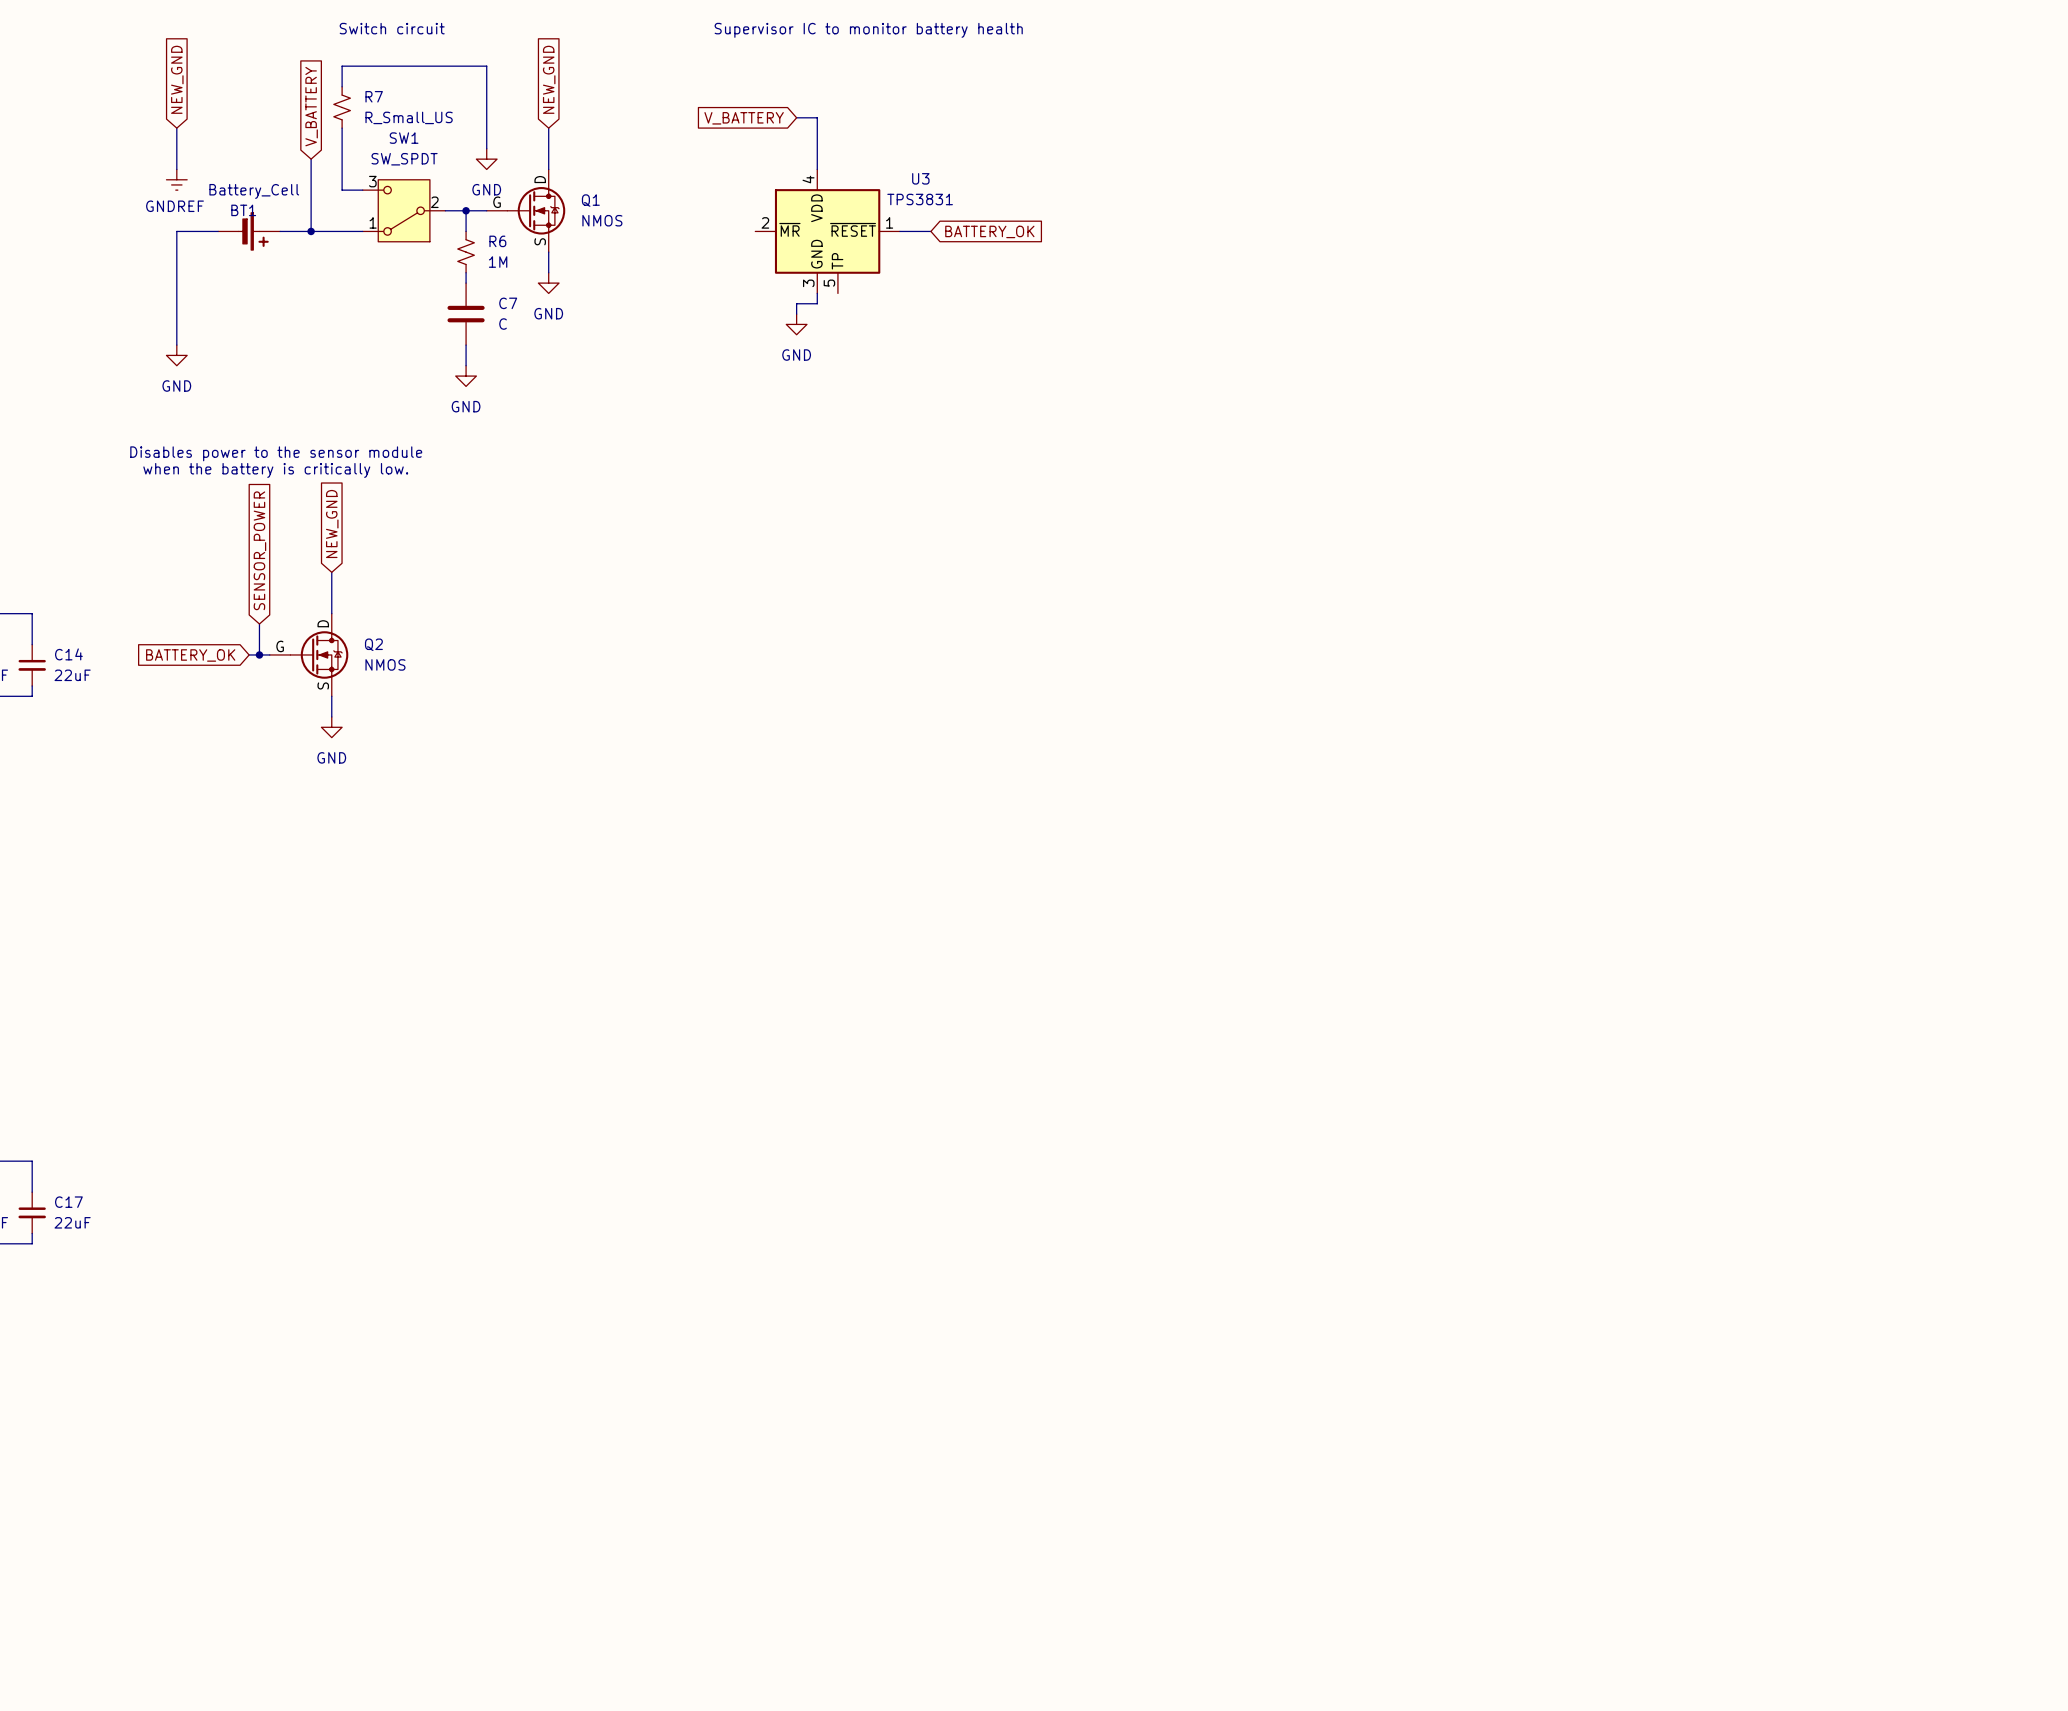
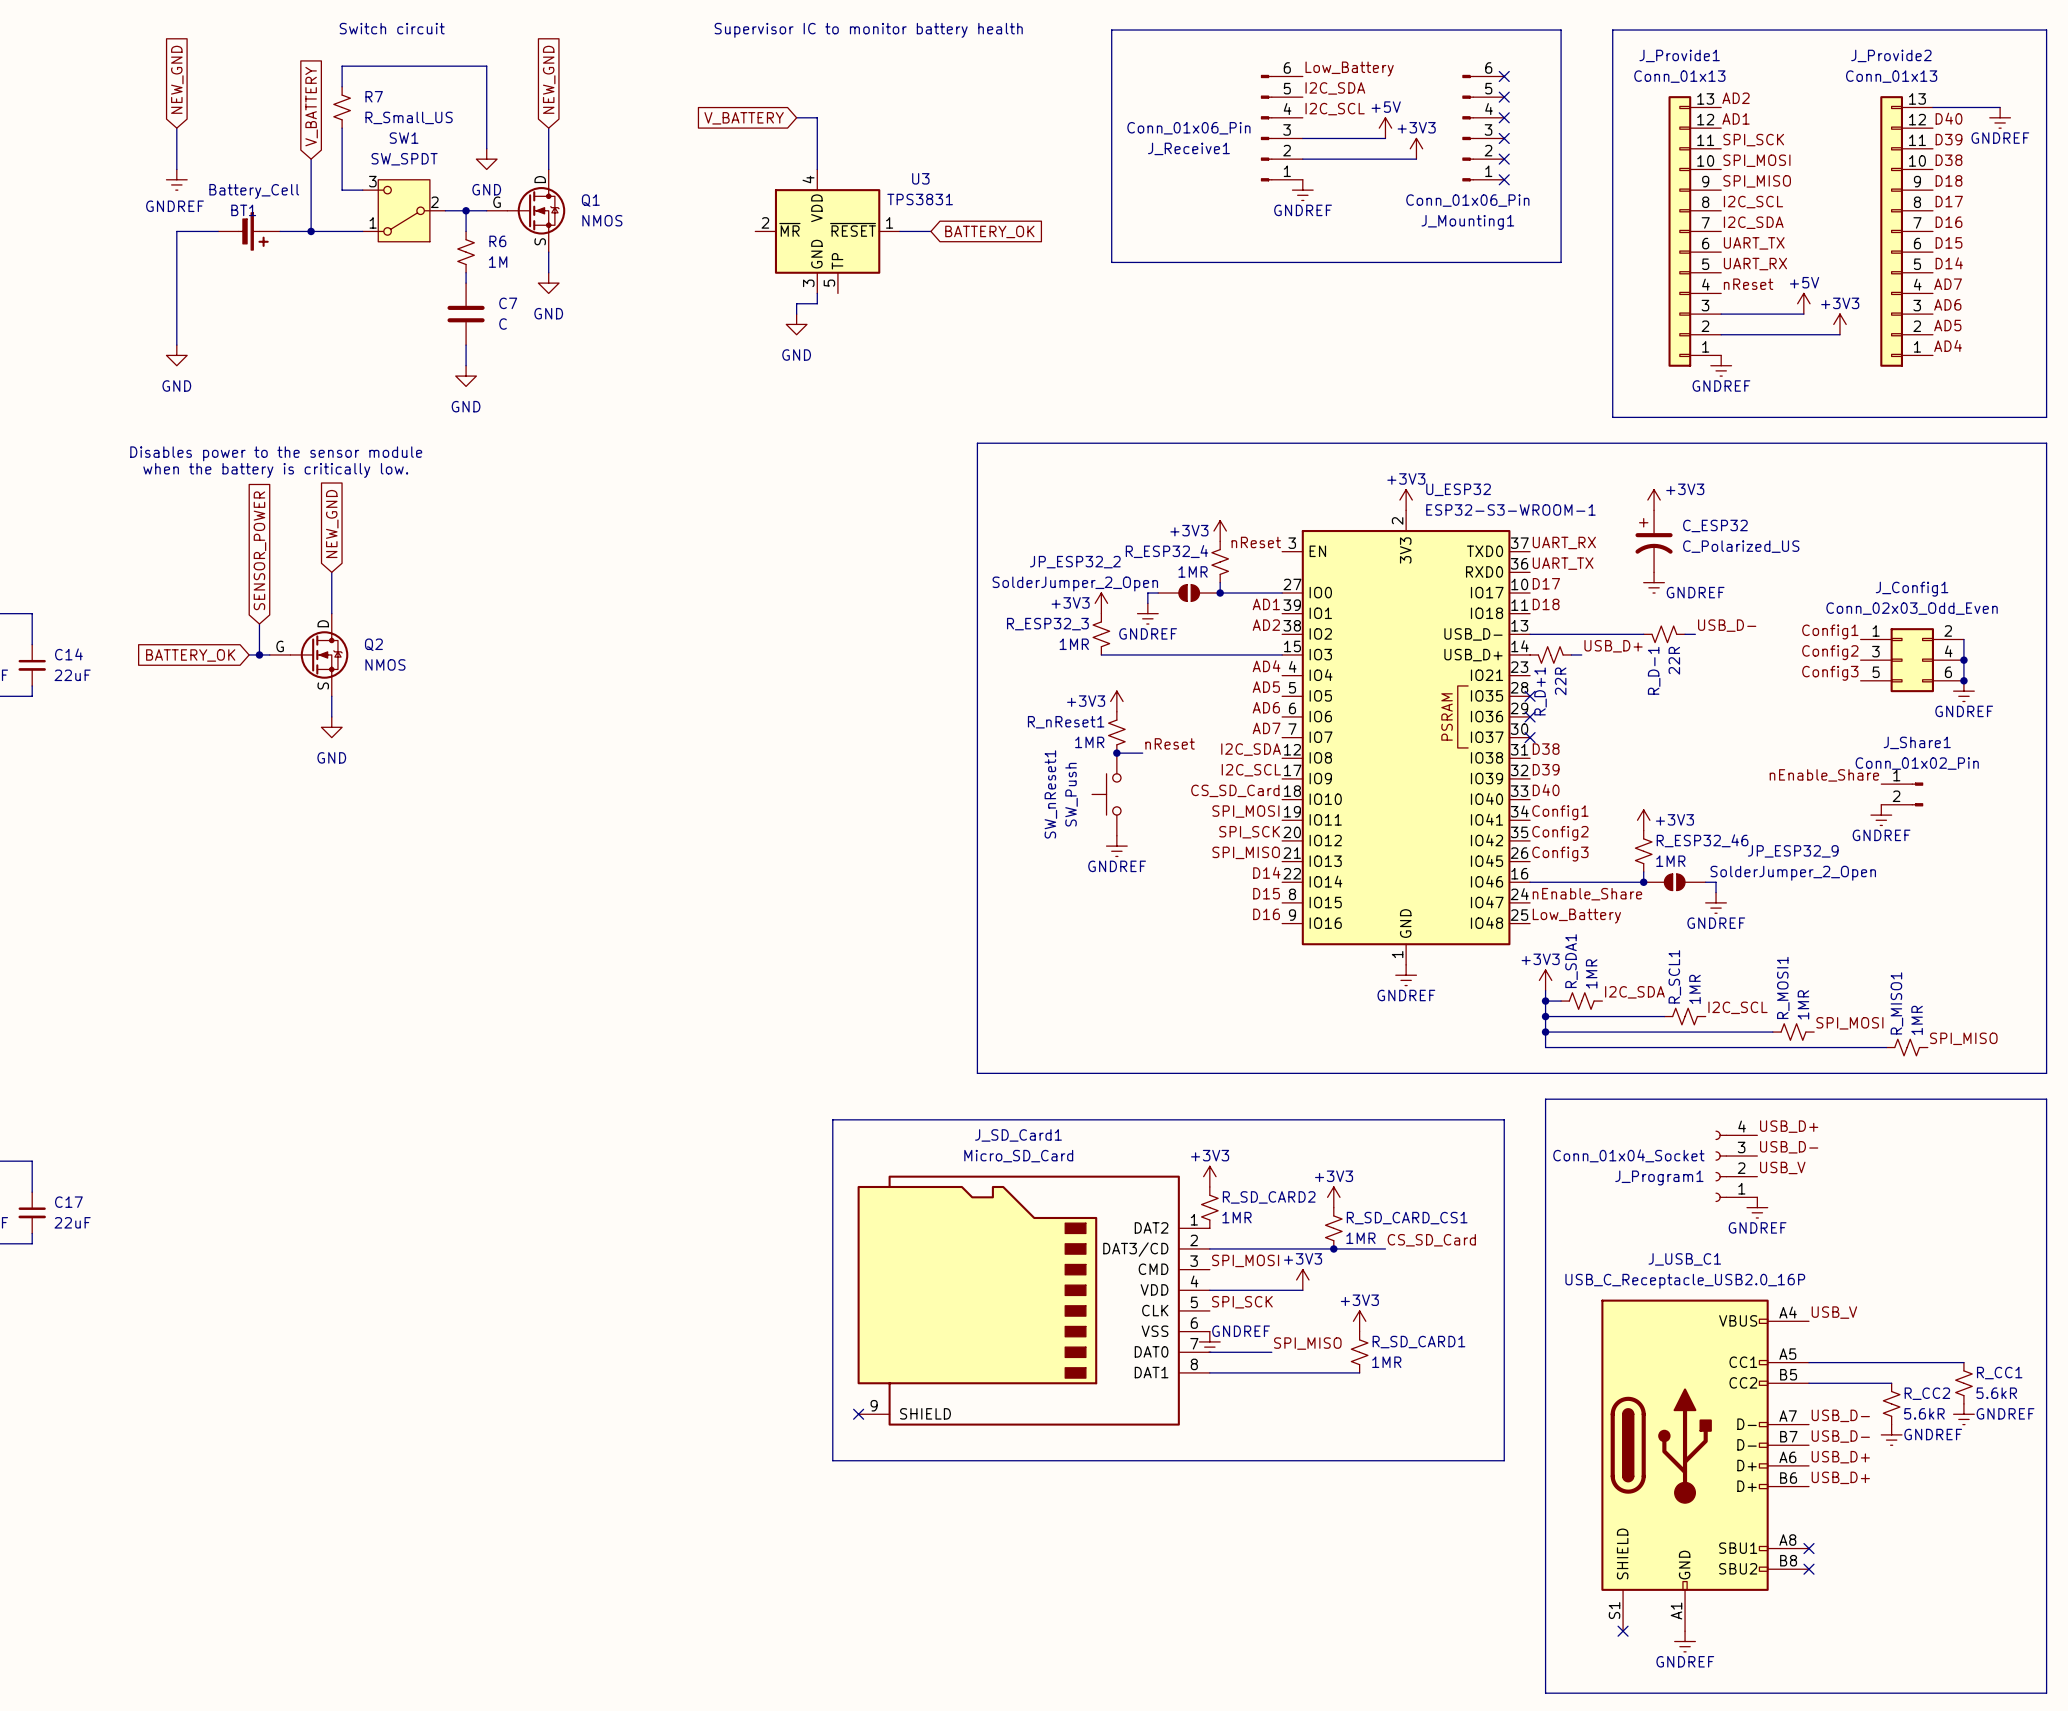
line: none -> (1111, 30) (1561, 30) (1561, 262) (1111, 262) (1111, 30)
line: none -> (1612, 30) (2046, 30) (2046, 417) (1612, 417) (1612, 30)
label: none -> Low_Battery (1349, 68)
no-connect mark: none -> (1504, 76)
label: none -> I2C_SDA (1335, 88)
no-connect mark: none -> (1504, 97)
label: none -> AD2 (1736, 98)
wire: none -> (1932, 107) (2000, 107)
label: none -> I2C_SCL (1335, 109)
no-connect mark: none -> (1504, 117)
power symbol: none -> GNDREF (2000, 117)
label: none -> AD1 (1736, 118)
label: none -> D40 (1949, 118)
J_Receive1: none -> Conn_01x06_Pin (1281, 128)
power symbol: none -> +5V (1385, 128)
J_Mounting1: none -> Conn_01x06_Pin (1483, 128)
wire: none -> (1302, 138) (1385, 138)
no-connect mark: none -> (1504, 138)
label: none -> D39 (1949, 139)
label: none -> SPI_SCK (1753, 140)
power symbol: none -> +3V3 (1416, 148)
wire: none -> (1302, 159) (1416, 159)
no-connect mark: none -> (1504, 159)
label: none -> SPI_MOSI (1756, 160)
label: none -> D38 (1949, 160)
no-connect mark: none -> (1504, 179)
label: none -> D18 (1949, 180)
label: none -> SPI_MISO (1757, 181)
power symbol: none -> GNDREF (1302, 190)
label: none -> D17 (1949, 201)
label: none -> I2C_SCL (1753, 202)
label: none -> I2C_SDA (1753, 222)
label: none -> D16 (1949, 222)
J_Provide1: none -> Conn_01x13 (1694, 231)
J_Provide2: none -> Conn_01x13 (1906, 231)
label: none -> D15 (1949, 242)
label: none -> UART_TX (1754, 243)
label: none -> D14 (1949, 263)
label: none -> UART_RX (1755, 264)
label: none -> nReset (1748, 284)
label: none -> AD7 (1948, 284)
power symbol: none -> +5V (1803, 303)
label: none -> AD6 (1947, 304)
wire: none -> (1721, 314) (1803, 314)
power symbol: none -> +3V3 (1839, 324)
label: none -> AD5 (1947, 325)
wire: none -> (1721, 334) (1839, 334)
label: none -> AD4 (1948, 345)
power symbol: none -> GNDREF (1721, 365)
line: none -> (977, 443) (2046, 443) (2046, 1073) (977, 1073) (977, 443)
power symbol: none -> +3V3 (1406, 500)
power symbol: none -> +3V3 (1654, 500)
power symbol: none -> +3V3 (1220, 531)
C_ESP32: none -> C_Polarized_US (1654, 541)
label: none -> nReset (1256, 542)
label: none -> UART_RX (1564, 542)
R_ESP32_4: none -> 1MR (1220, 562)
label: none -> UART_TX (1563, 563)
wire: none -> (1220, 582) (1220, 593) (1282, 593)
power symbol: none -> GNDREF (1654, 582)
label: none -> D17 (1546, 583)
wire: none -> (1158, 593) (1147, 593) (1147, 603)
JP_ESP32_2: none -> SolderJumper_2_Open (1189, 593)
junction: none -> (1220, 593)
power symbol: none -> +3V3 (1101, 603)
label: none -> AD1 (1266, 604)
label: none -> D18 (1546, 604)
power symbol: none -> GNDREF (1147, 613)
label: none -> AD2 (1266, 625)
label: none -> USB_D- (1727, 625)
label: none -> Config1 (1830, 631)
R_ESP32_3: none -> 1MR (1101, 634)
wire: none -> (1530, 634) (1643, 634)
R_D-1: none -> 22R (1664, 634)
wire: none -> (1685, 634) (1695, 634)
wire: none -> (1963, 639) (1963, 680)
label: none -> USB_D+ (1613, 646)
label: none -> Config2 (1830, 652)
wire: none -> (1101, 654) (1282, 654)
R_D+1: none -> 22R (1550, 654)
wire: none -> (1571, 654) (1581, 654)
J_Config1: none -> Conn_02x03_Odd_Even (1912, 660)
junction: none -> (1963, 660)
label: none -> AD4 (1266, 666)
label: none -> Config3 (1830, 673)
junction: none -> (1963, 680)
label: none -> AD5 (1266, 687)
power symbol: none -> GNDREF (1963, 691)
no-connect mark: none -> (1530, 696)
power symbol: none -> +3V3 (1116, 701)
label: none -> AD6 (1266, 707)
no-connect mark: none -> (1530, 716)
label: none -> AD7 (1266, 728)
R_nReset1: none -> 1MR (1116, 732)
U_ESP32: none -> ESP32-S3-WROOM-1 (1406, 737)
no-connect mark: none -> (1530, 737)
label: none -> nReset (1170, 743)
label: none -> I2C_SDA (1251, 749)
label: none -> D38 (1546, 749)
wire: none -> (1116, 753) (1142, 753)
junction: none -> (1116, 753)
label: none -> D39 (1546, 769)
label: none -> I2C_SCL (1251, 770)
label: none -> nEnable_Share (1824, 775)
label: none -> CS_SD_Card (1235, 790)
label: none -> D40 (1546, 790)
SW_nReset1: none -> SW_Push (1106, 794)
J_Share1: none -> Conn_01x02_Pin (1902, 794)
label: none -> SPI_MOSI (1245, 811)
label: none -> Config1 (1560, 812)
power symbol: none -> GNDREF (1881, 815)
power symbol: none -> +3V3 (1643, 820)
label: none -> SPI_SCK (1249, 832)
label: none -> Config2 (1560, 833)
power symbol: none -> GNDREF (1116, 846)
R_ESP32_46: none -> 1MR (1643, 851)
label: none -> SPI_MISO (1246, 852)
label: none -> Config3 (1560, 854)
wire: none -> (1643, 871) (1643, 882) (1530, 882)
label: none -> D14 (1266, 872)
junction: none -> (1643, 882)
JP_ESP32_9: none -> SolderJumper_2_Open (1674, 882)
wire: none -> (1705, 882) (1716, 882) (1716, 892)
label: none -> D15 (1266, 893)
label: none -> nEnable_Share (1587, 894)
power symbol: none -> GNDREF (1716, 902)
label: none -> D16 (1266, 914)
label: none -> Low_Battery (1576, 916)
power symbol: none -> GNDREF (1406, 975)
power symbol: none -> +3V3 (1545, 980)
wire: none -> (1545, 990) (1545, 1047) (1886, 1047)
label: none -> I2C_SDA (1634, 992)
wire: none -> (1545, 1001) (1561, 1001)
junction: none -> (1545, 1001)
R_SDA1: none -> 1MR (1581, 1001)
label: none -> I2C_SCL (1737, 1007)
wire: none -> (1545, 1016) (1664, 1016)
junction: none -> (1545, 1016)
R_SCL1: none -> 1MR (1685, 1016)
label: none -> SPI_MOSI (1849, 1023)
wire: none -> (1545, 1032) (1772, 1032)
junction: none -> (1545, 1032)
R_MOSI1: none -> 1MR (1793, 1032)
label: none -> SPI_MISO (1963, 1038)
R_MISO1: none -> 1MR (1907, 1047)
line: none -> (1545, 1099) (2046, 1099) (2046, 1693) (1545, 1693) (1545, 1099)
line: none -> (832, 1119) (1504, 1119) (1504, 1460) (832, 1460) (832, 1119)
label: none -> USB_D+ (1789, 1126)
label: none -> USB_D- (1789, 1147)
J_Program1: none -> Conn_01x04_Socket (1736, 1166)
label: none -> USB_V (1782, 1167)
power symbol: none -> +3V3 (1209, 1176)
power symbol: none -> +3V3 (1333, 1197)
R_SD_CARD2: none -> 1MR (1209, 1207)
power symbol: none -> GNDREF (1757, 1207)
R_SD_CARD_CS1: none -> 1MR (1333, 1228)
label: none -> CS_SD_Card (1431, 1240)
wire: none -> (1209, 1248) (1385, 1248)
junction: none -> (1333, 1248)
label: none -> SPI_MOSI (1245, 1260)
power symbol: none -> +3V3 (1302, 1279)
wire: none -> (1209, 1290) (1302, 1290)
J_SD_Card1: none -> Micro_SD_Card (1033, 1300)
label: none -> SPI_SCK (1242, 1302)
label: none -> USB_V (1834, 1312)
power symbol: none -> +3V3 (1359, 1321)
power symbol: none -> GNDREF (1209, 1341)
label: none -> SPI_MISO (1307, 1343)
wire: none -> (1209, 1352) (1271, 1352)
R_SD_CARD1: none -> 1MR (1359, 1352)
wire: none -> (1808, 1362) (1963, 1362)
wire: none -> (1209, 1372) (1359, 1372)
wire: none -> (1808, 1383) (1891, 1383)
R_CC1: none -> 5.6kR (1963, 1383)
R_CC2: none -> 5.6kR (1891, 1403)
no-connect mark: none -> (858, 1414)
power symbol: none -> GNDREF (1963, 1414)
label: none -> USB_D- (1840, 1415)
power symbol: none -> GNDREF (1891, 1434)
label: none -> USB_D- (1840, 1436)
label: none -> USB_D+ (1840, 1457)
J_USB_C1: none -> USB_C_Receptacle_USB2.0_16P (1705, 1465)
label: none -> USB_D+ (1840, 1477)
no-connect mark: none -> (1808, 1548)
no-connect mark: none -> (1808, 1569)
no-connect mark: none -> (1623, 1631)
power symbol: none -> GNDREF (1685, 1641)

